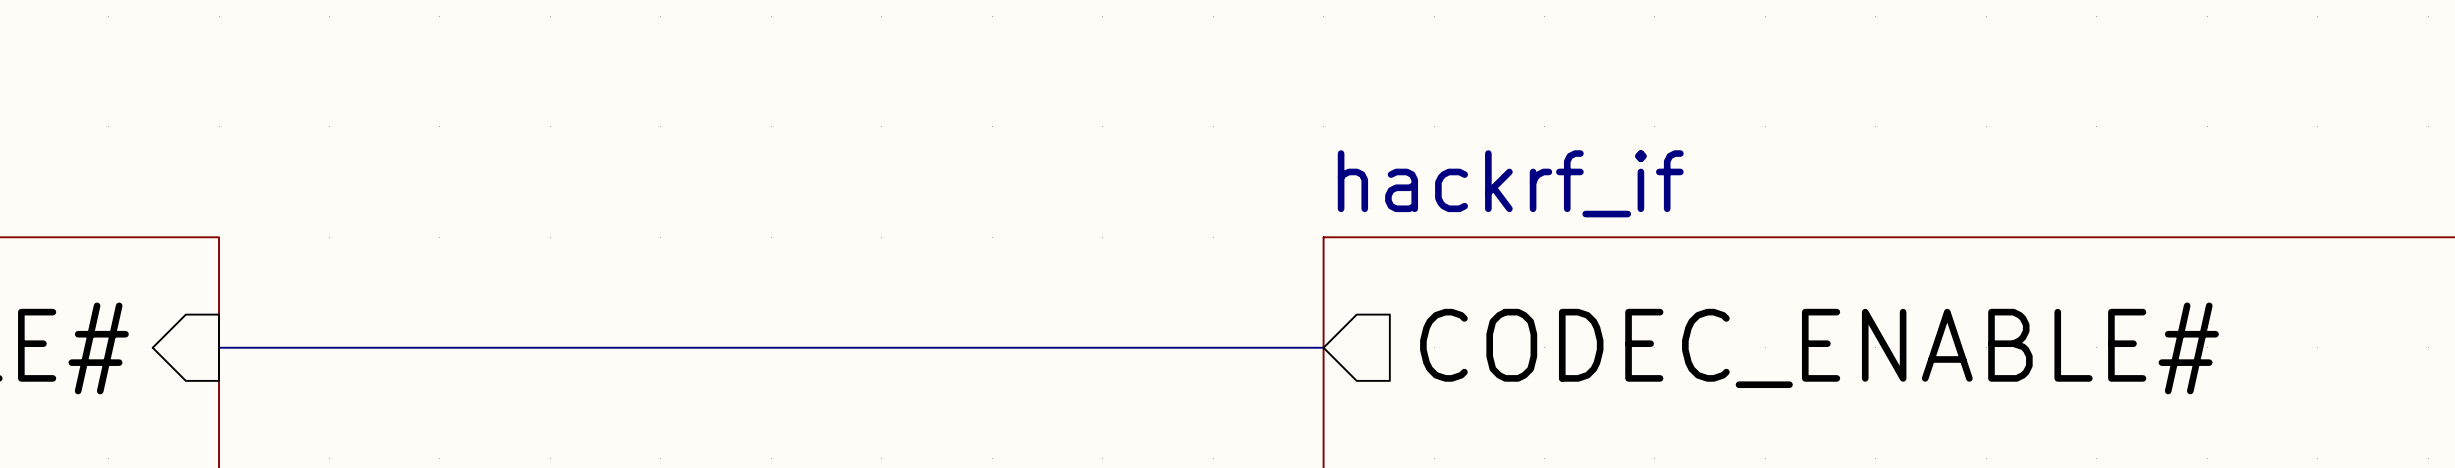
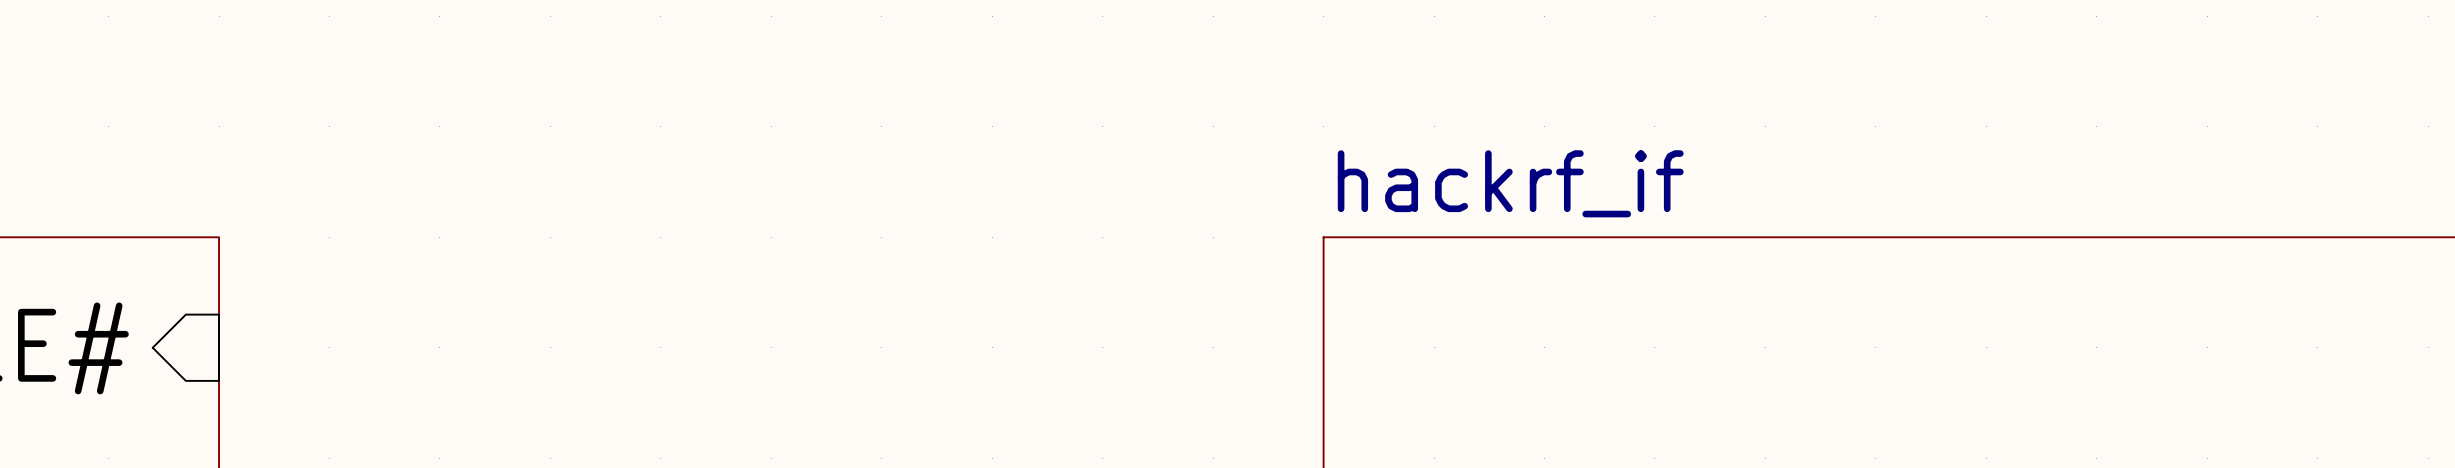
wire: (219, 347) (1323, 347) -> none
sheet pin: CODEC_ENABLE# (1819, 348) -> none

